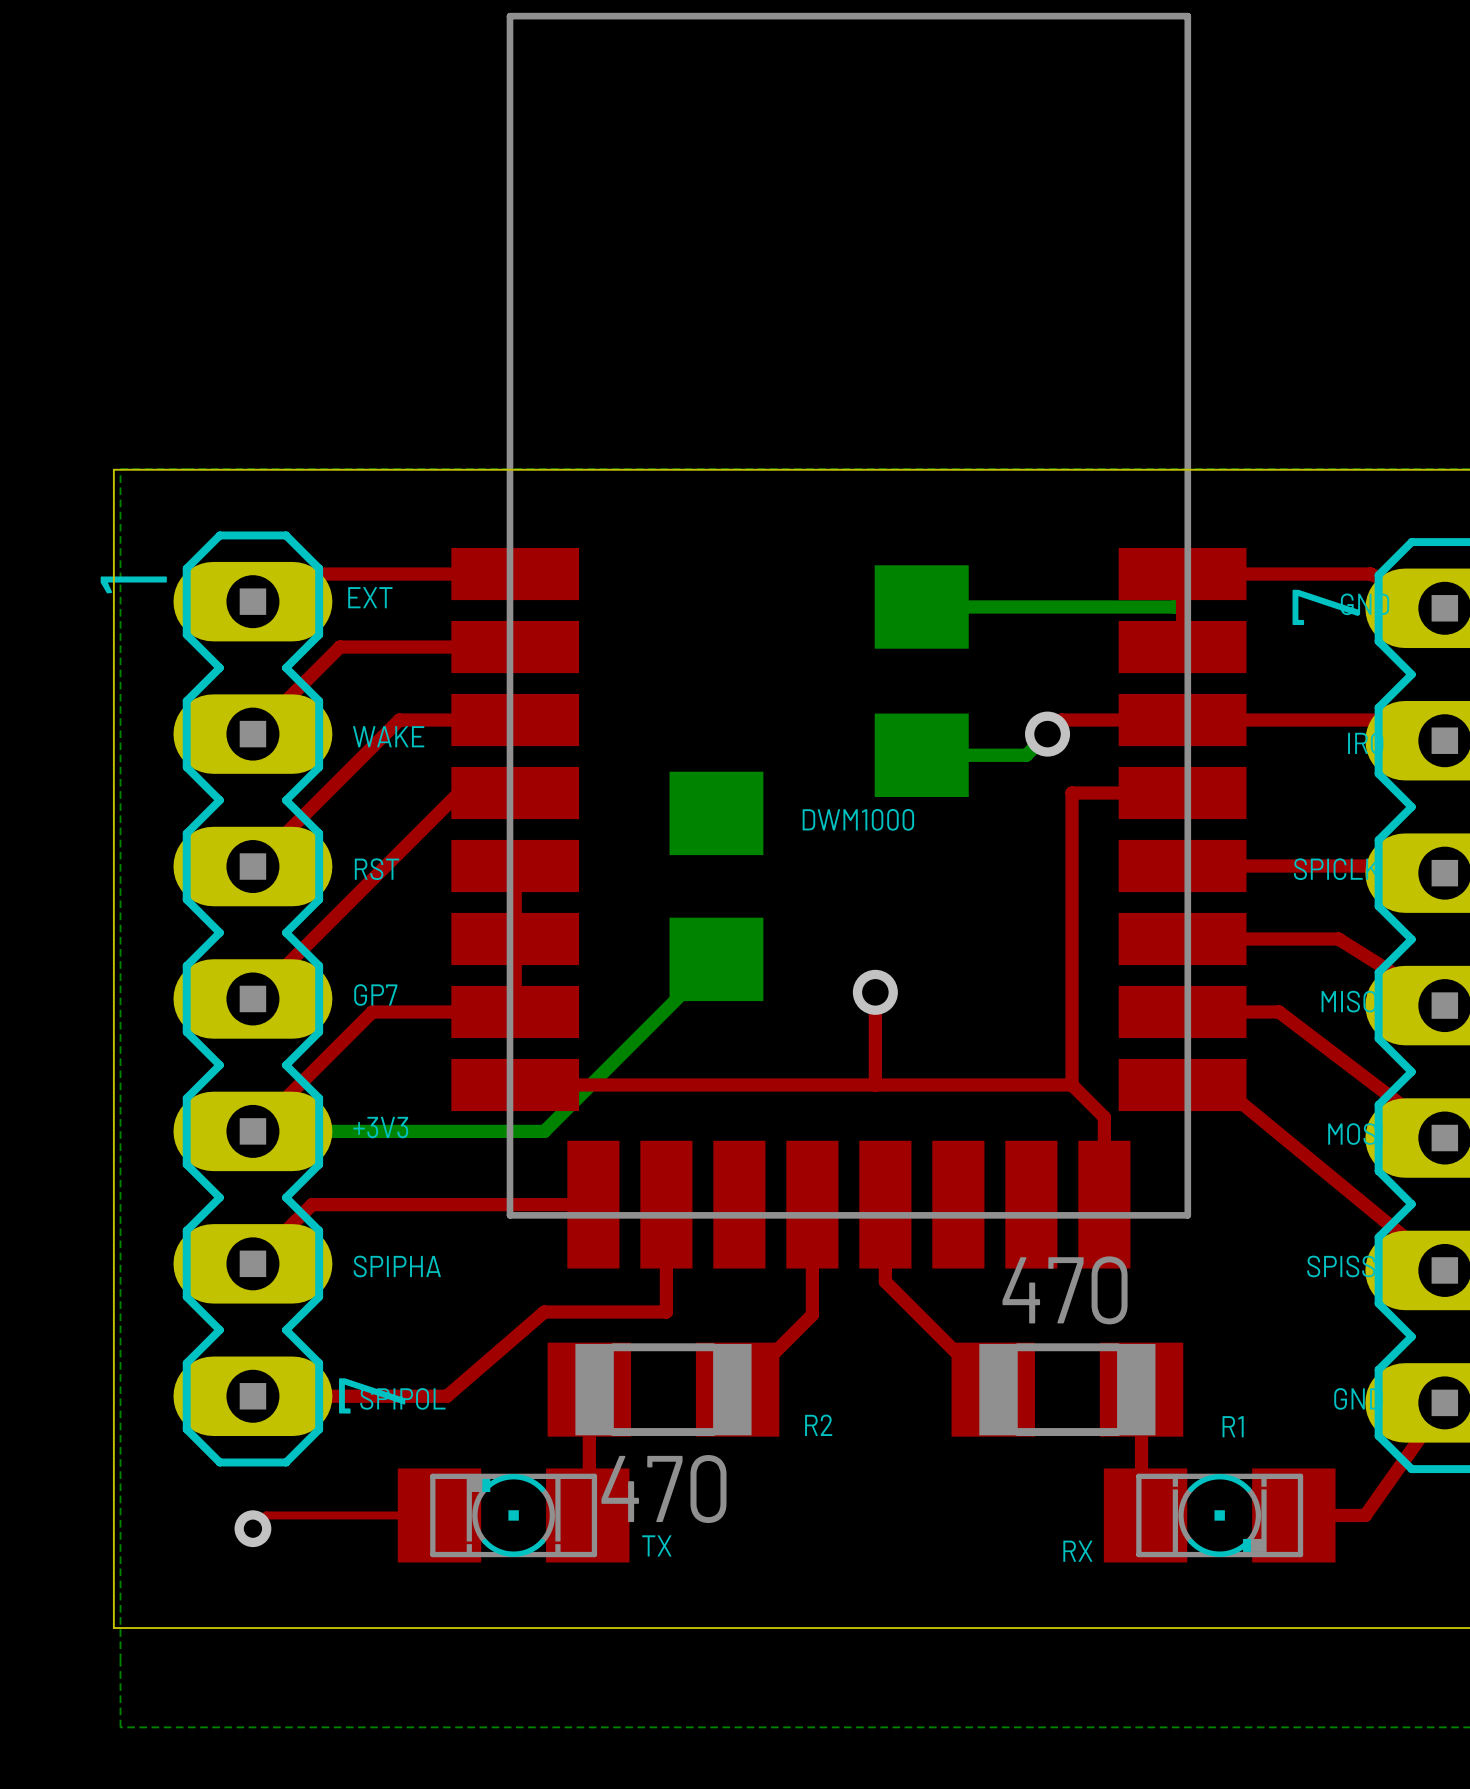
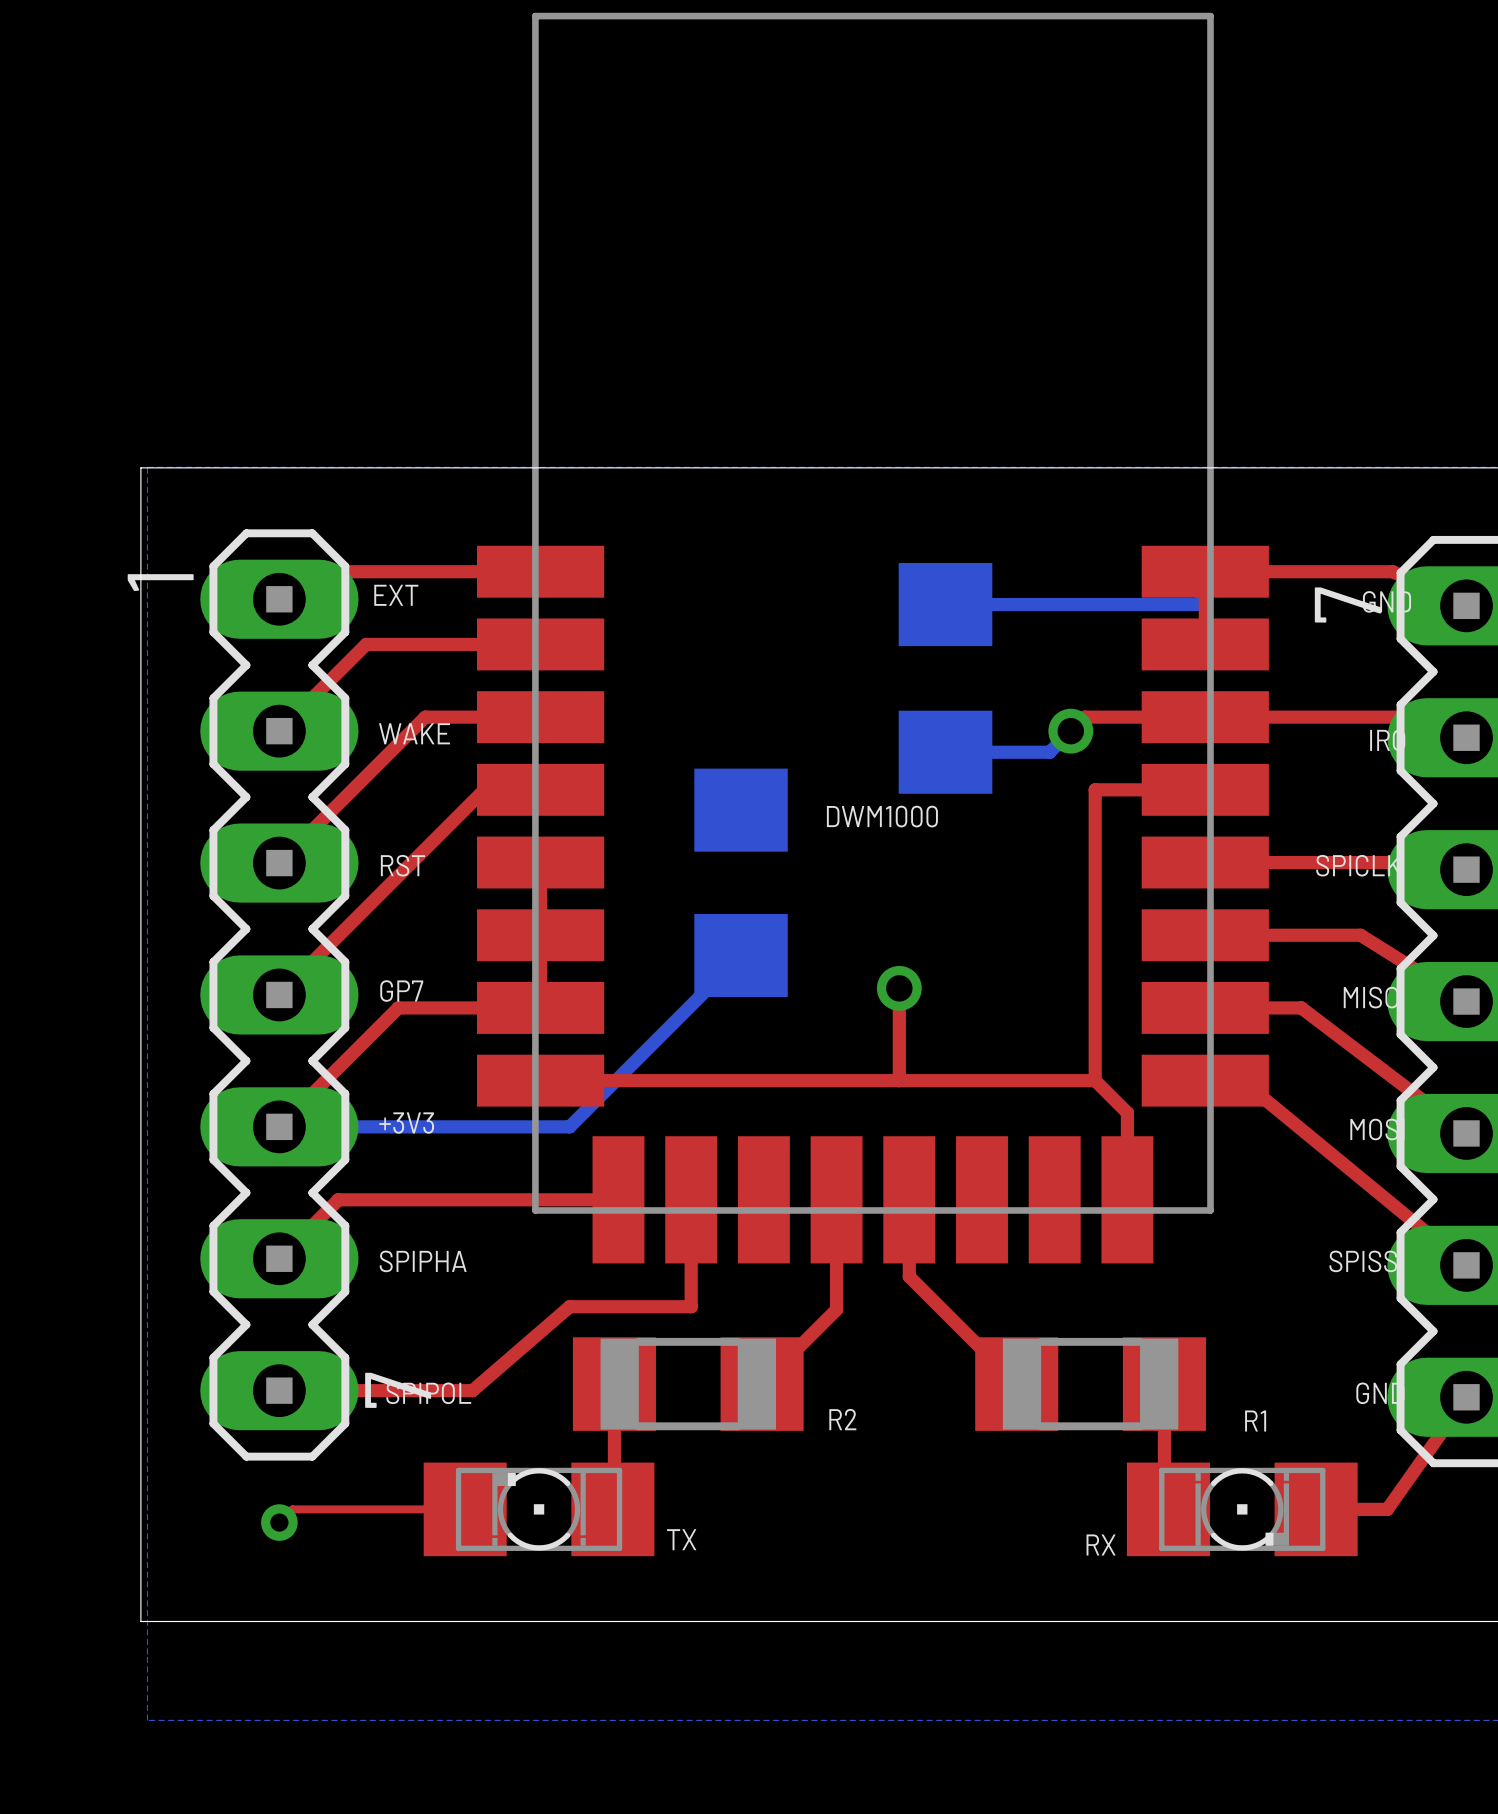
R1 value: 470 (1065, 1290) -> none
R2 value: 470 (663, 1489) -> none

